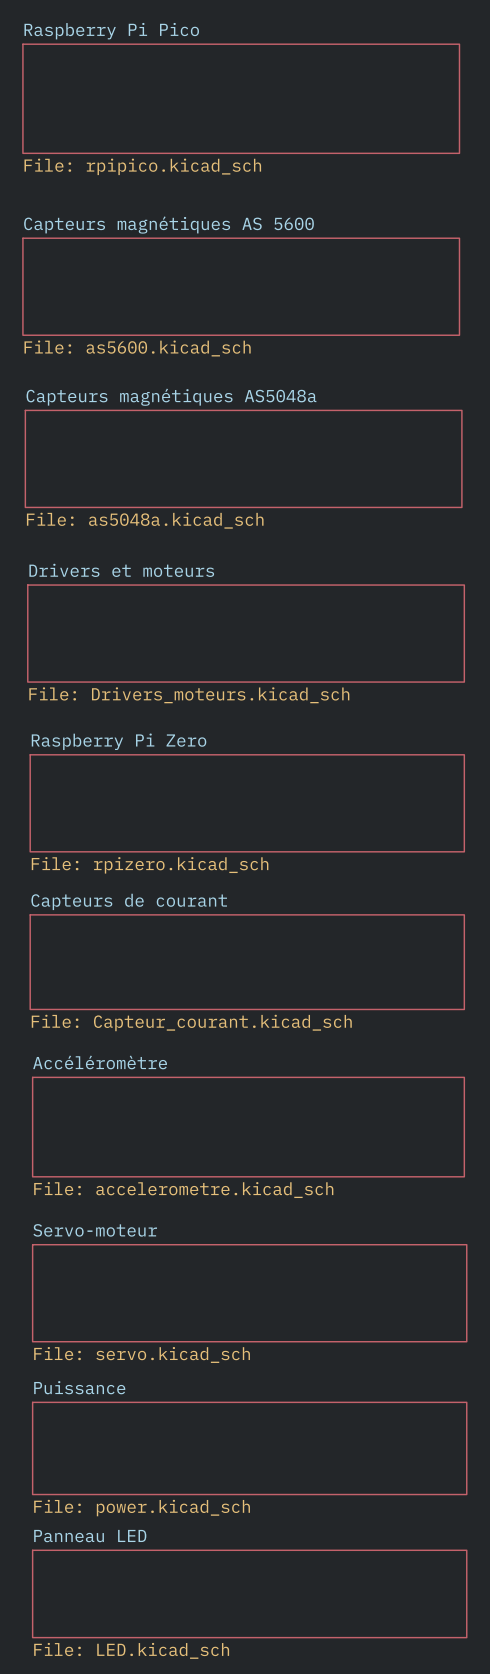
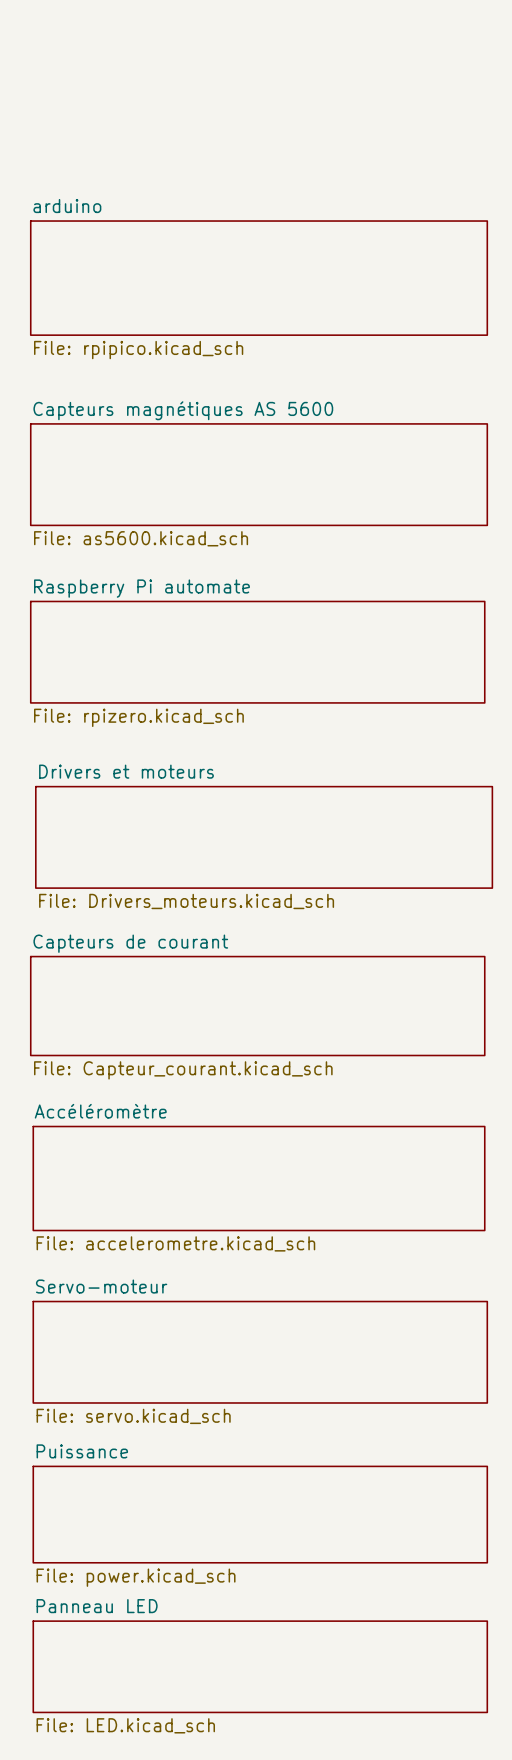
sheet Raspberry Pi Pico: File: rpipico.kicad_sch (241, 98) -> none
sheet arduino: none -> File: rpipico.kicad_sch (259, 278)
sheet Capteurs magnétiques AS 5600 position: (241, 286) -> (259, 474)
sheet Capteurs magnétiques AS5048a: File: as5048a.kicad_sch (243, 458) -> none
sheet Raspberry Pi automate: none -> File: rpizero.kicad_sch (257, 652)
sheet Drivers et moteurs position: (246, 633) -> (264, 837)
sheet Raspberry Pi Zero: File: rpizero.kicad_sch (247, 803) -> none

